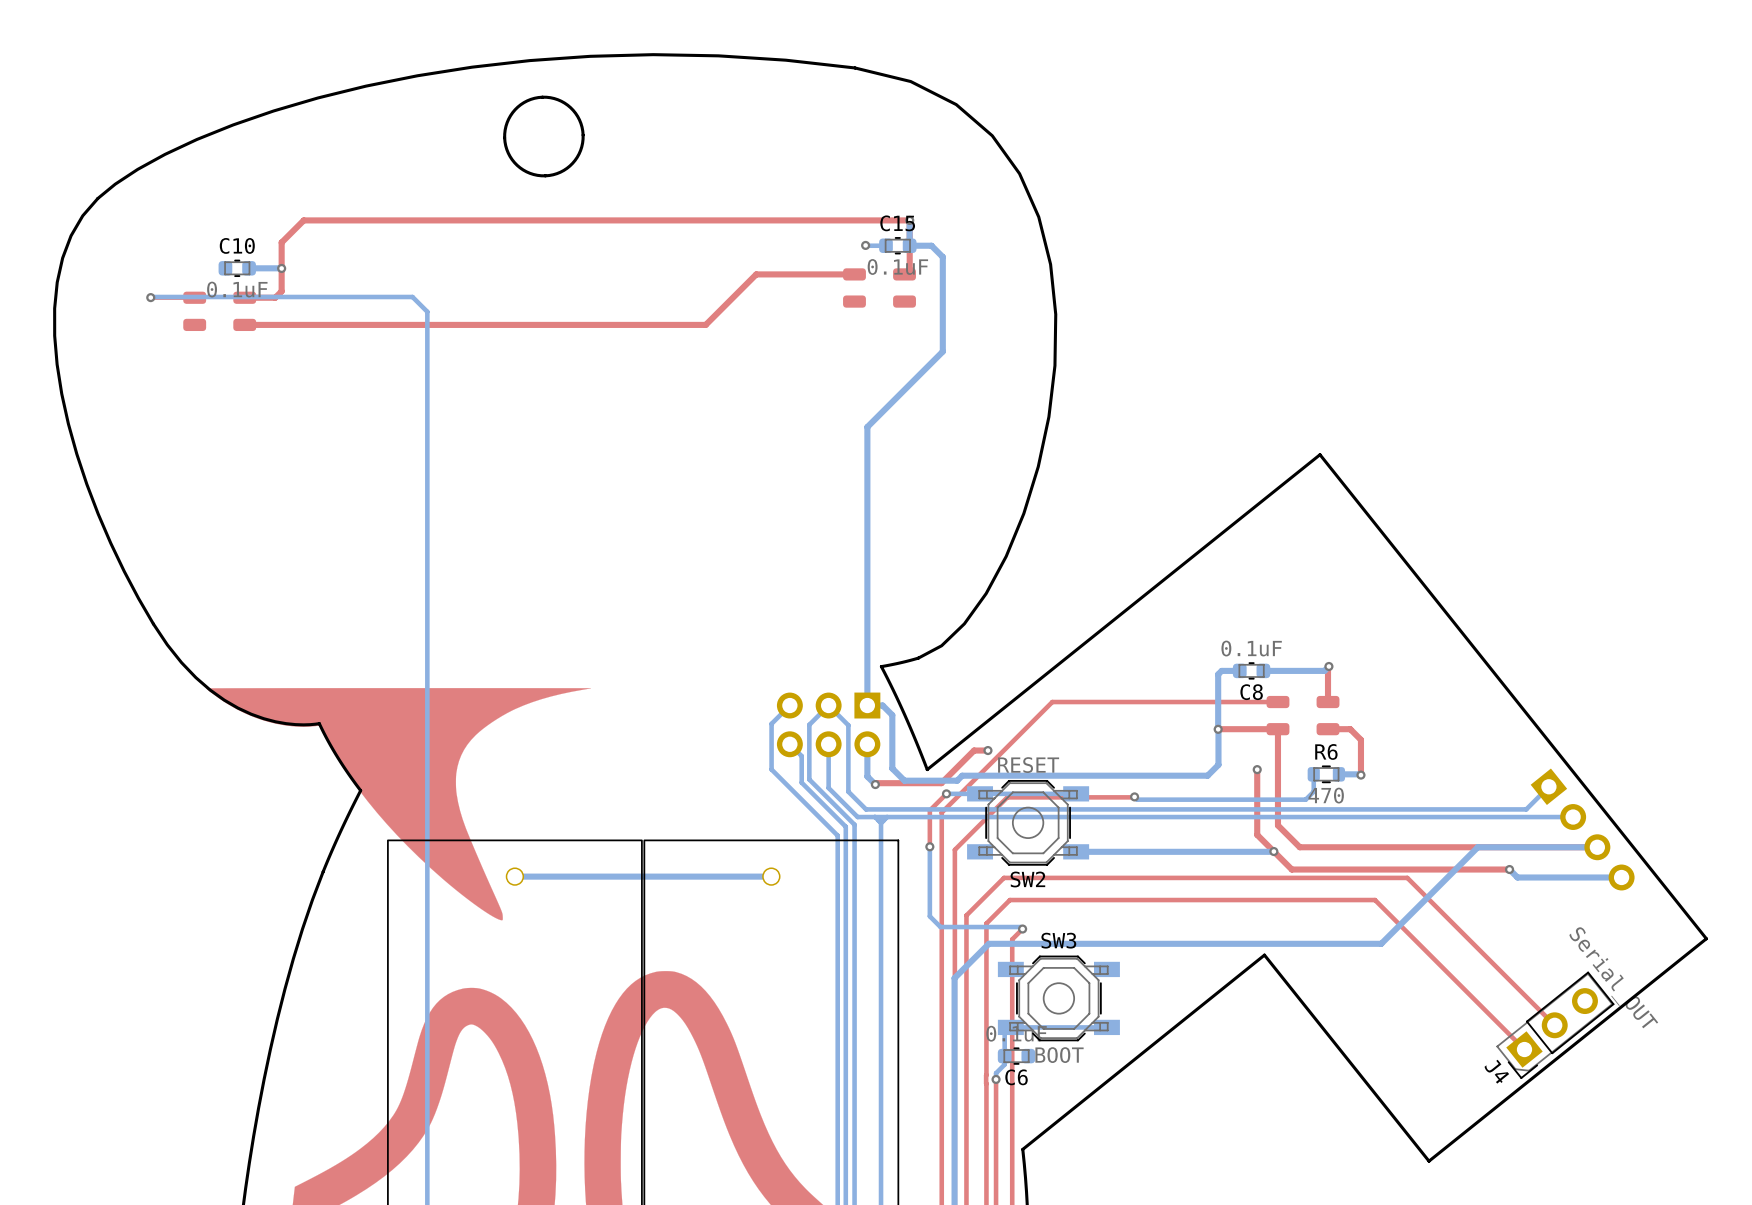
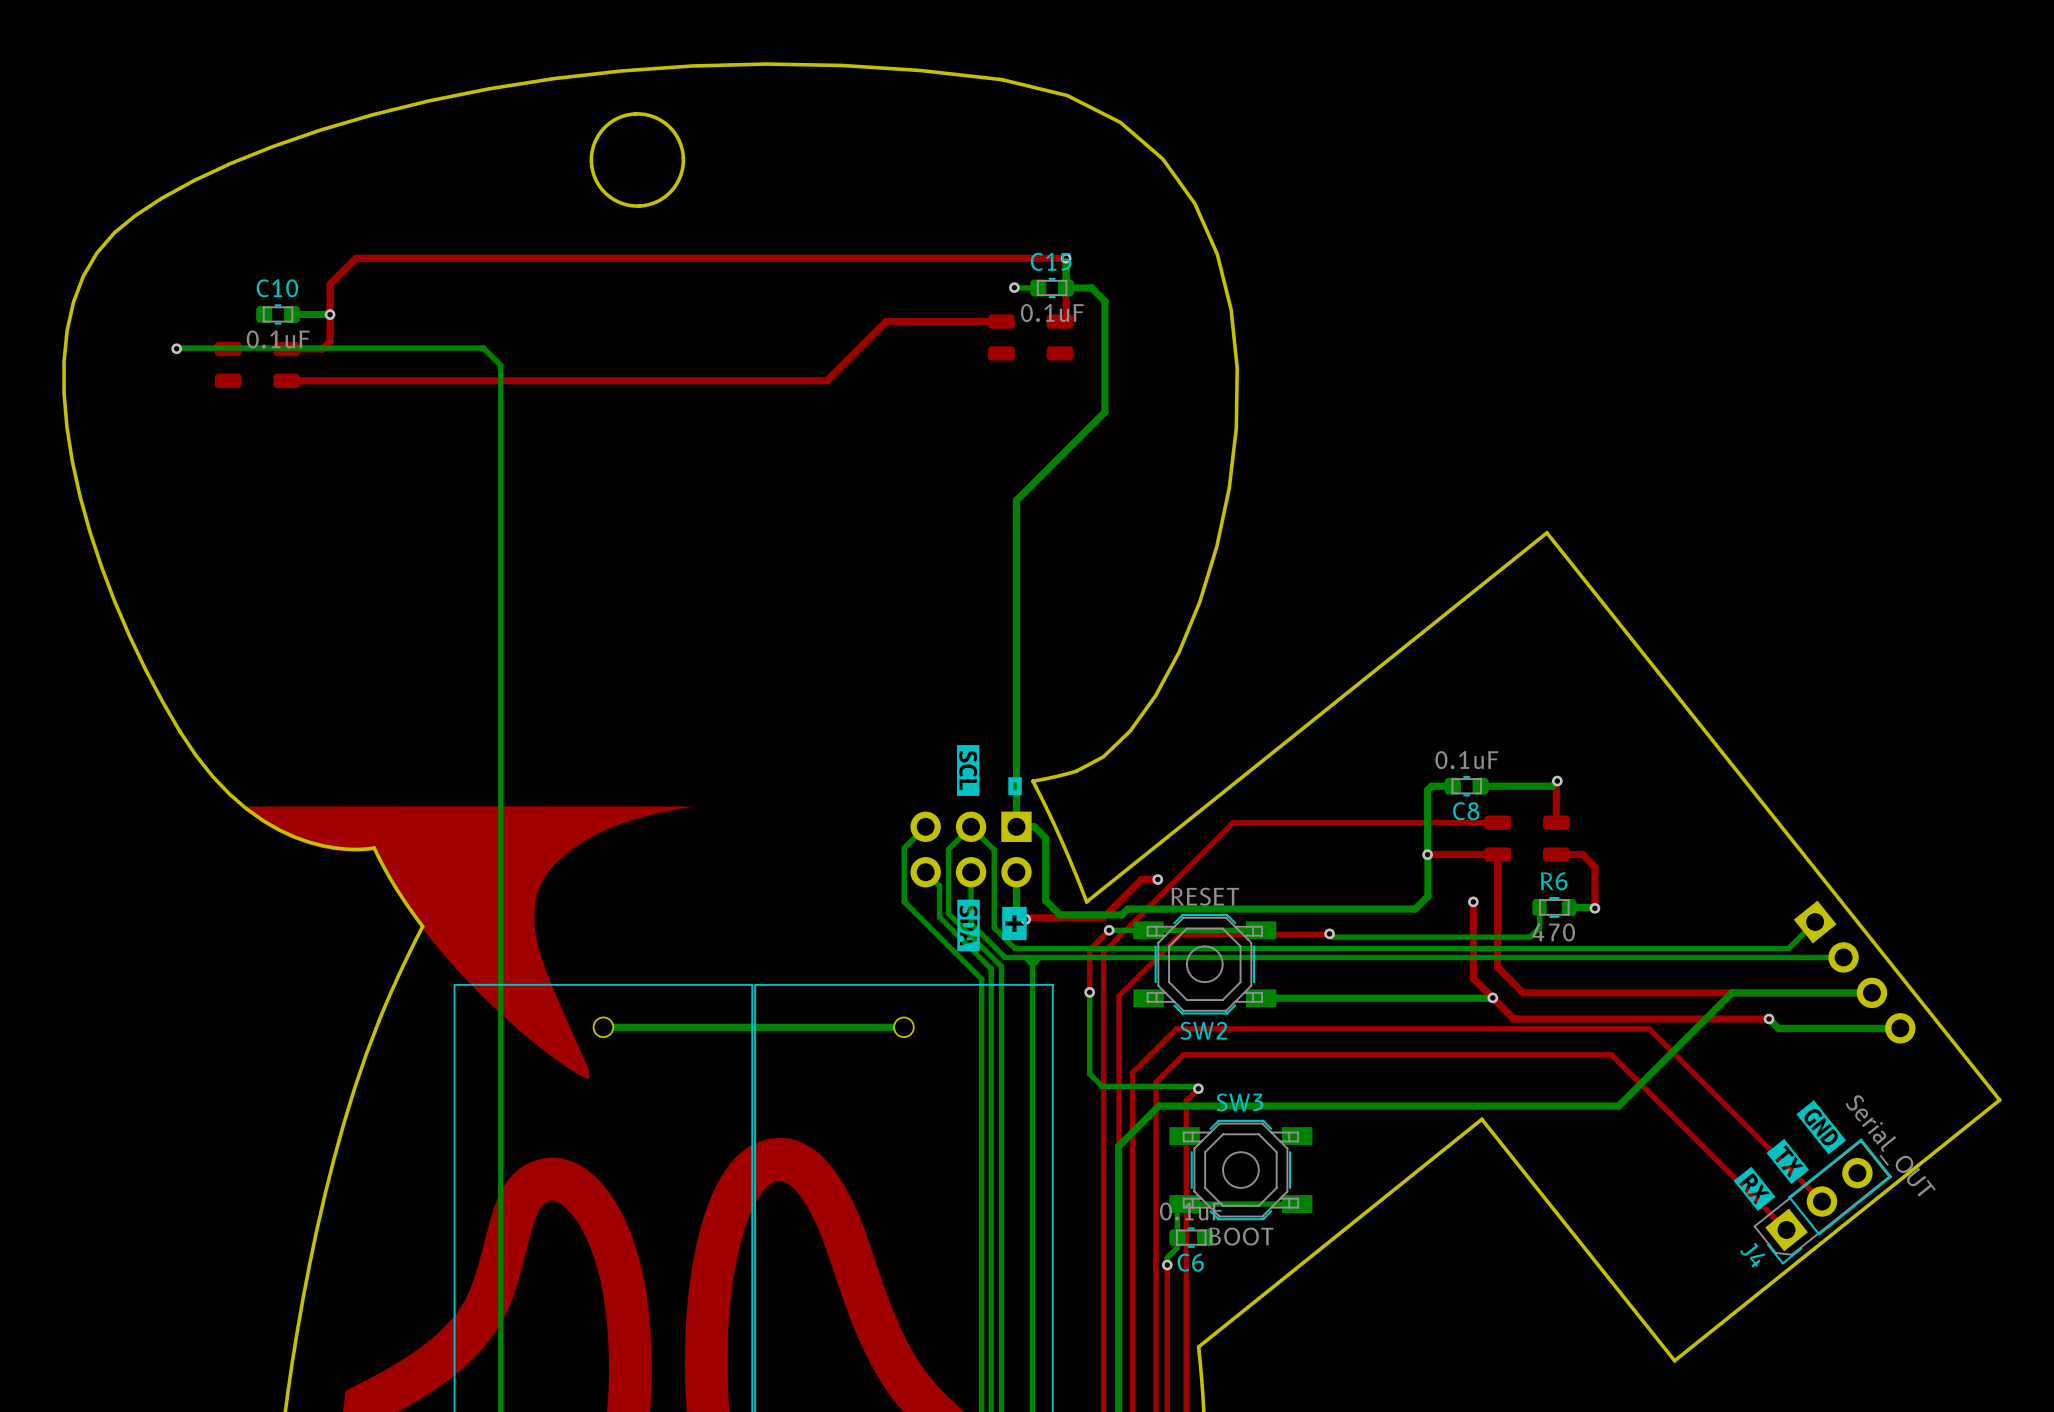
drawing: none -> [956, 745, 980, 796]
drawing: none -> [1008, 777, 1022, 796]
drawing: none -> [957, 899, 980, 952]
drawing: none -> [1002, 906, 1027, 941]
drawing: none -> [1733, 1100, 1847, 1211]

